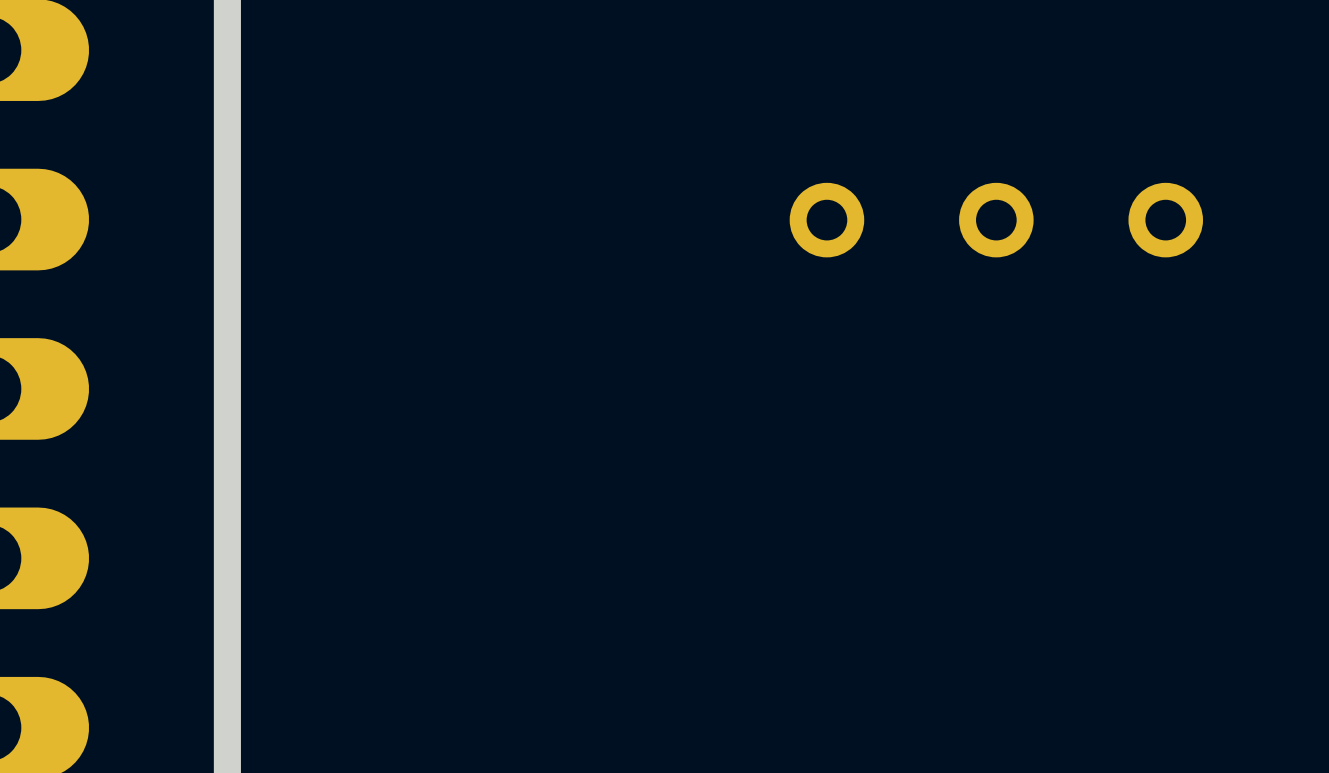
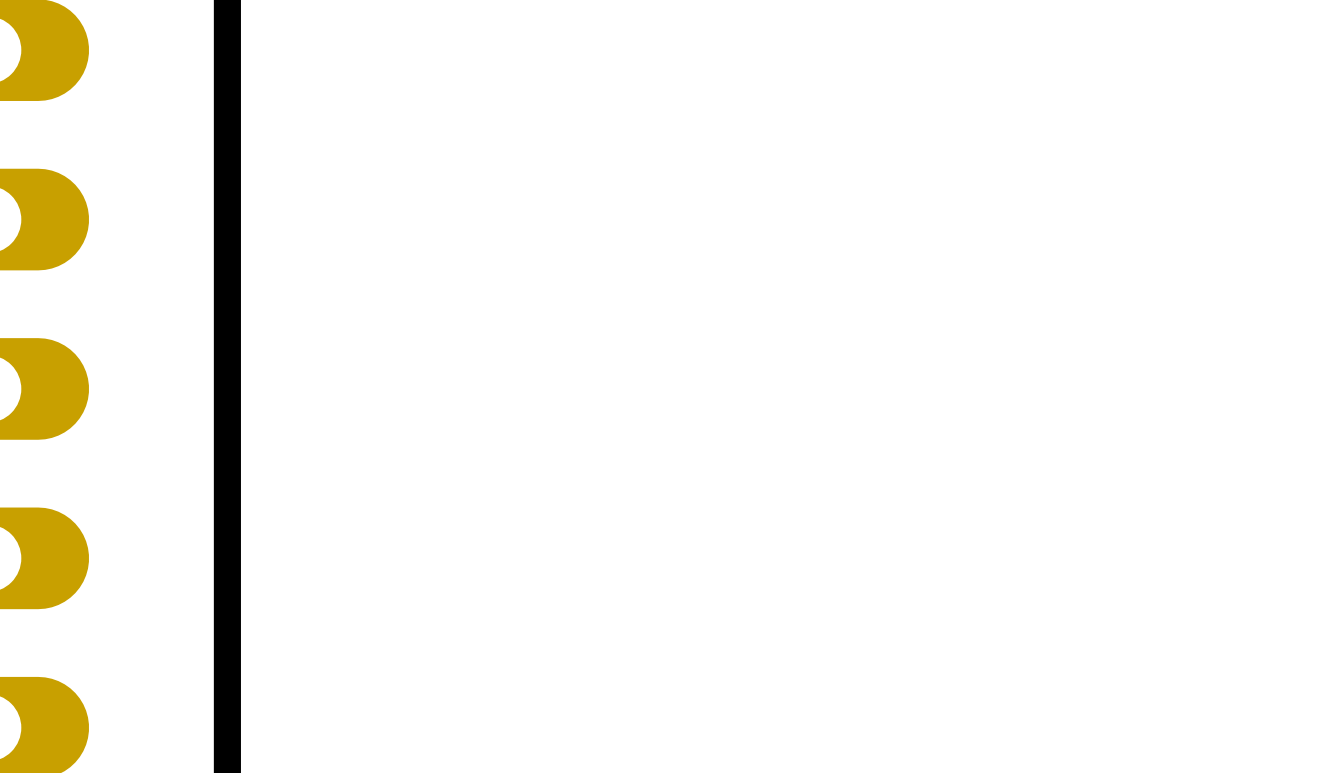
part: (996, 220) -> none

